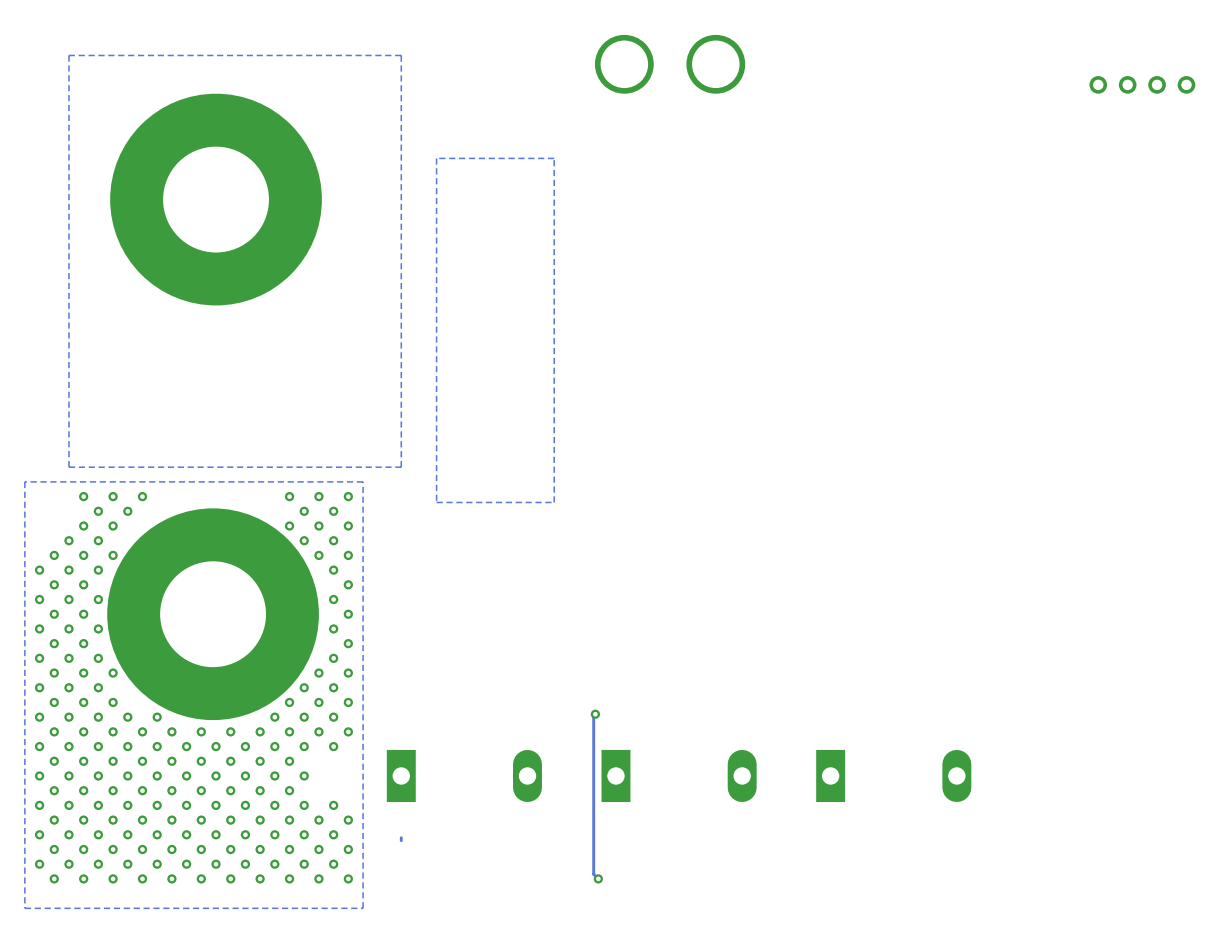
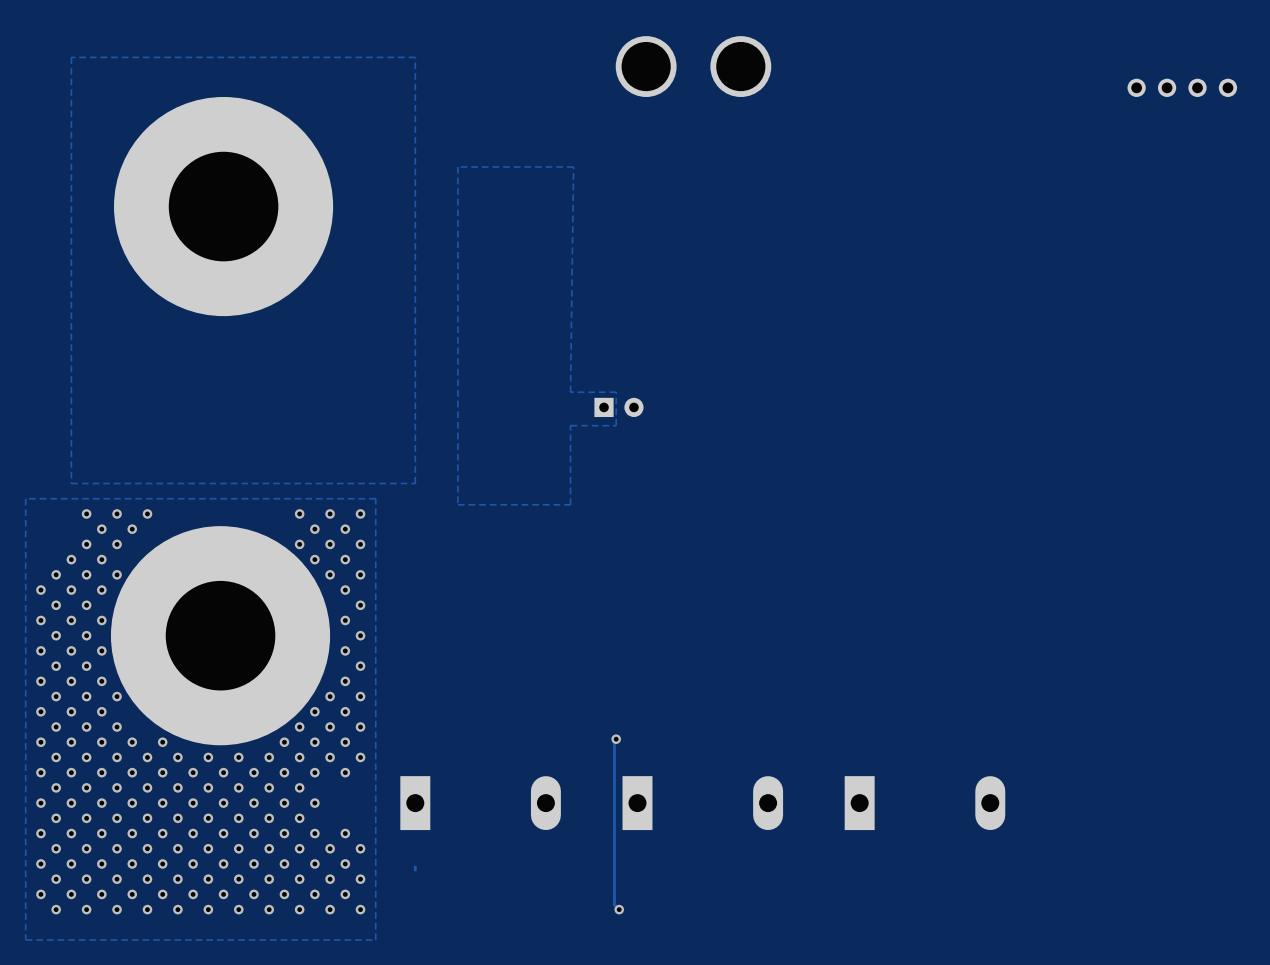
zone outline: (554, 158) (554, 502) (436, 502) (436, 158) (554, 158) -> (573, 166) (570, 392) (616, 392) (616, 425) (570, 425) (570, 504) (457, 504) (457, 166) (573, 166)
part: none -> (618, 407)

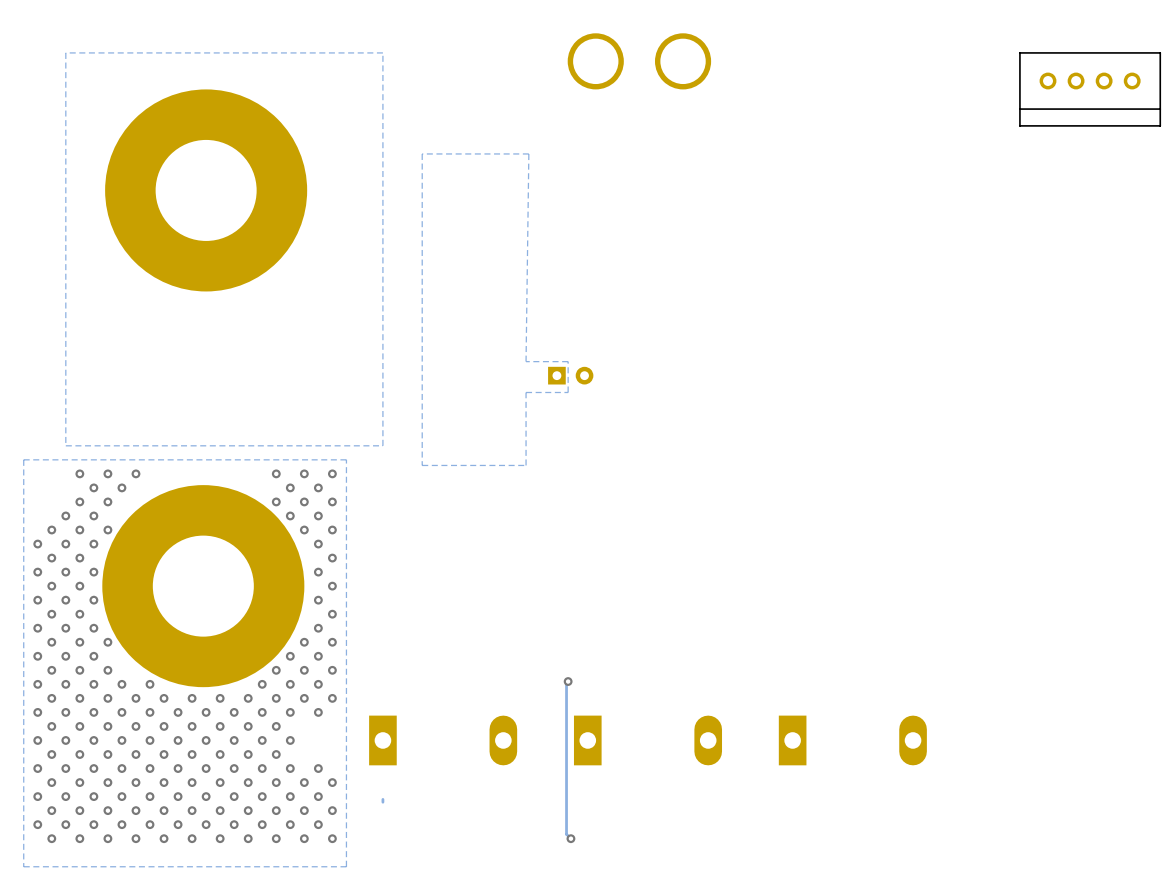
part side: top (1182, 87) -> bottom (1090, 89)

